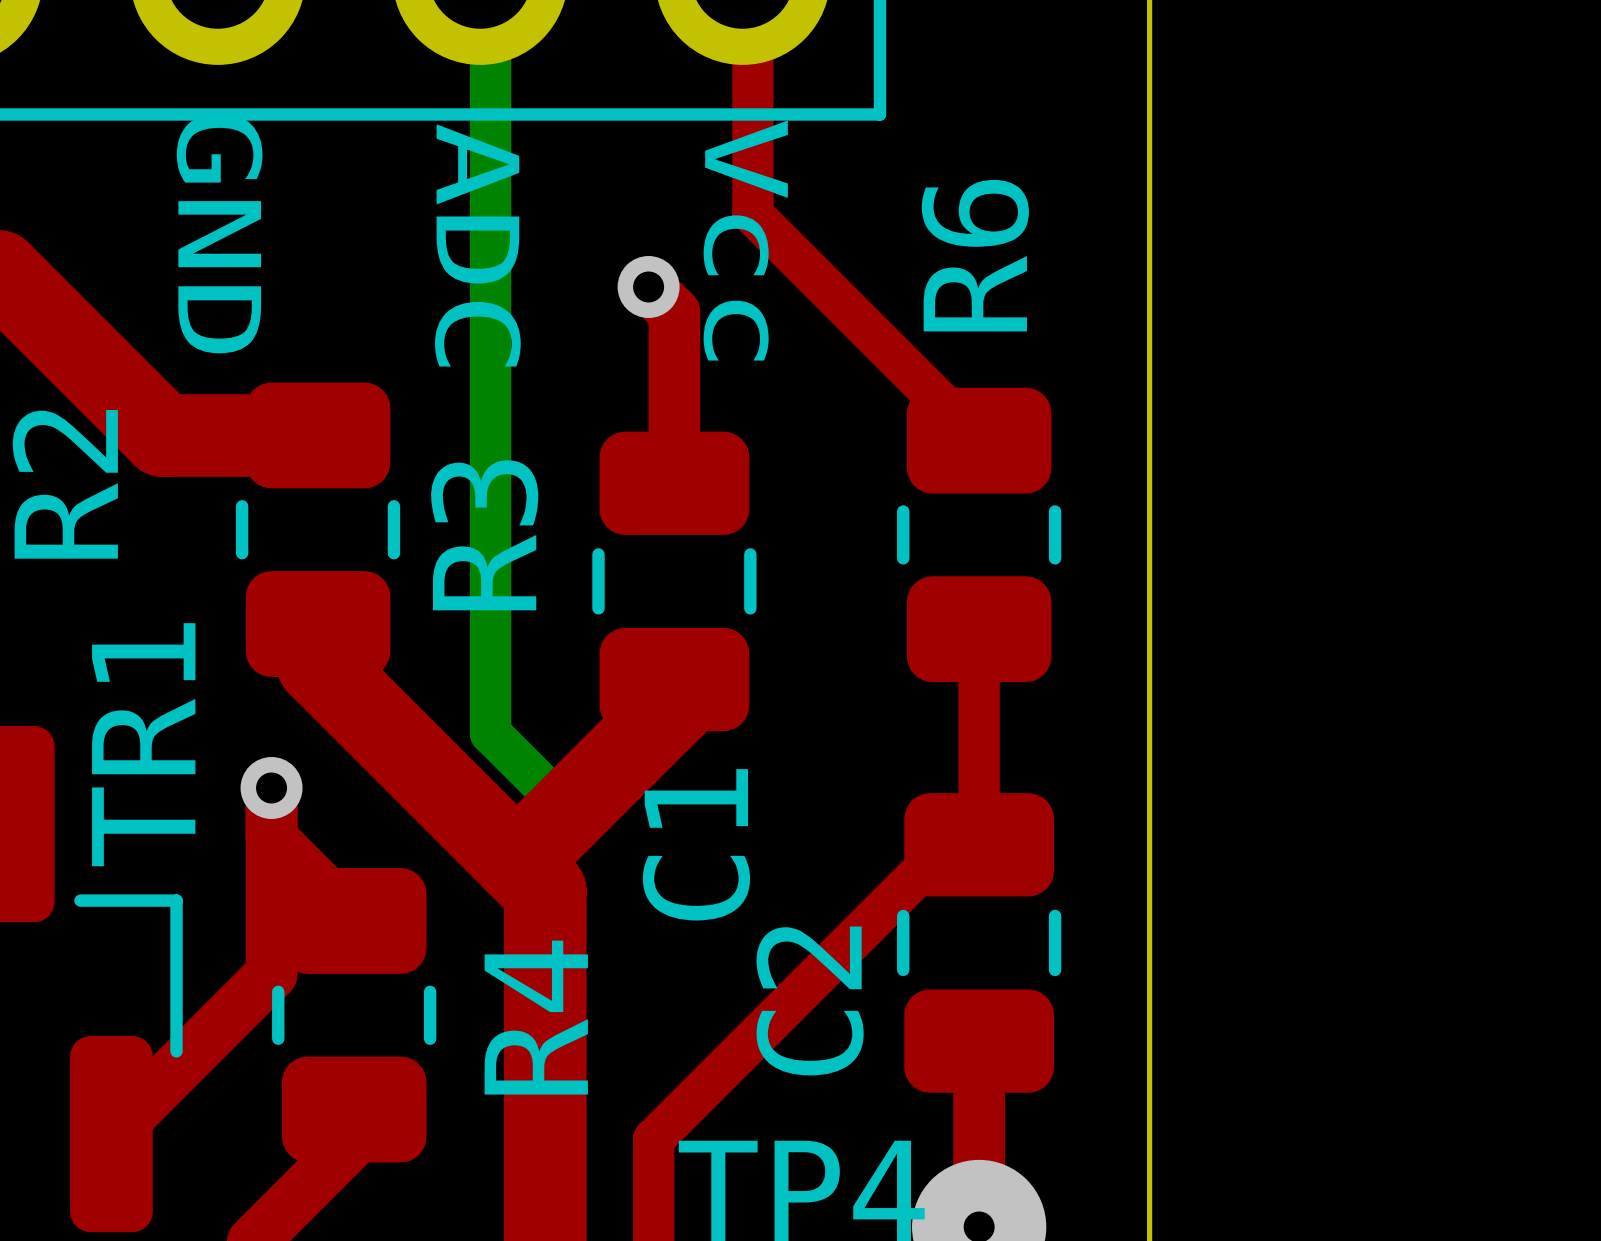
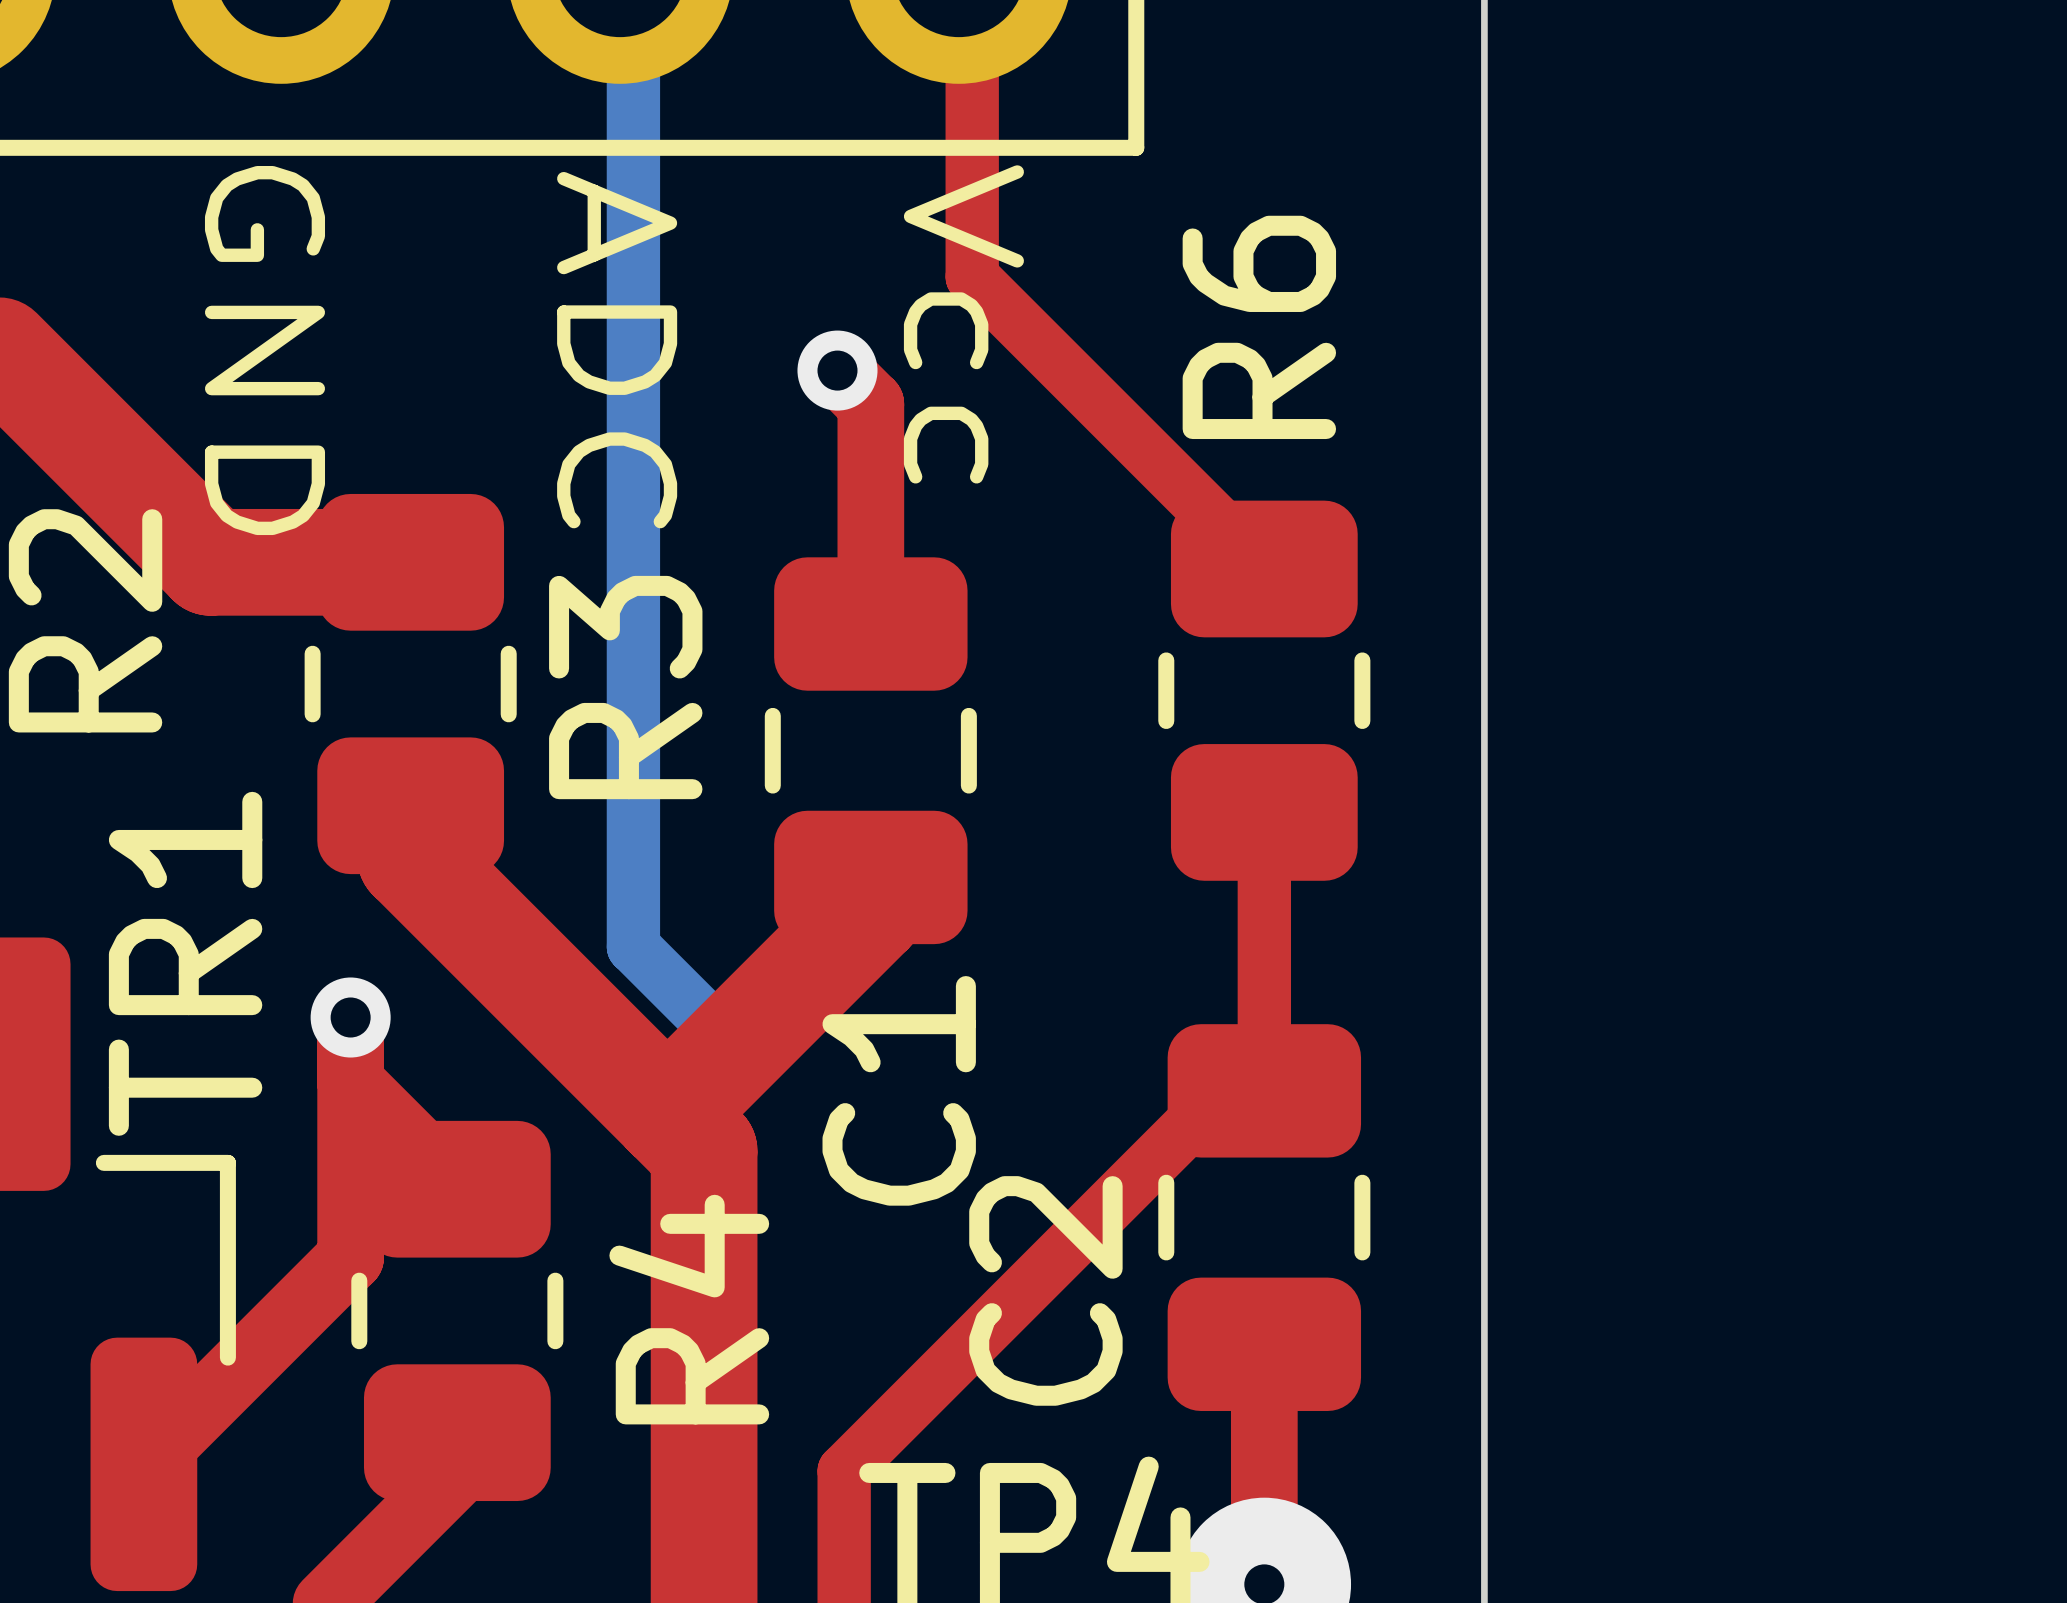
text position: GND (219, 233) -> GND (264, 350)

